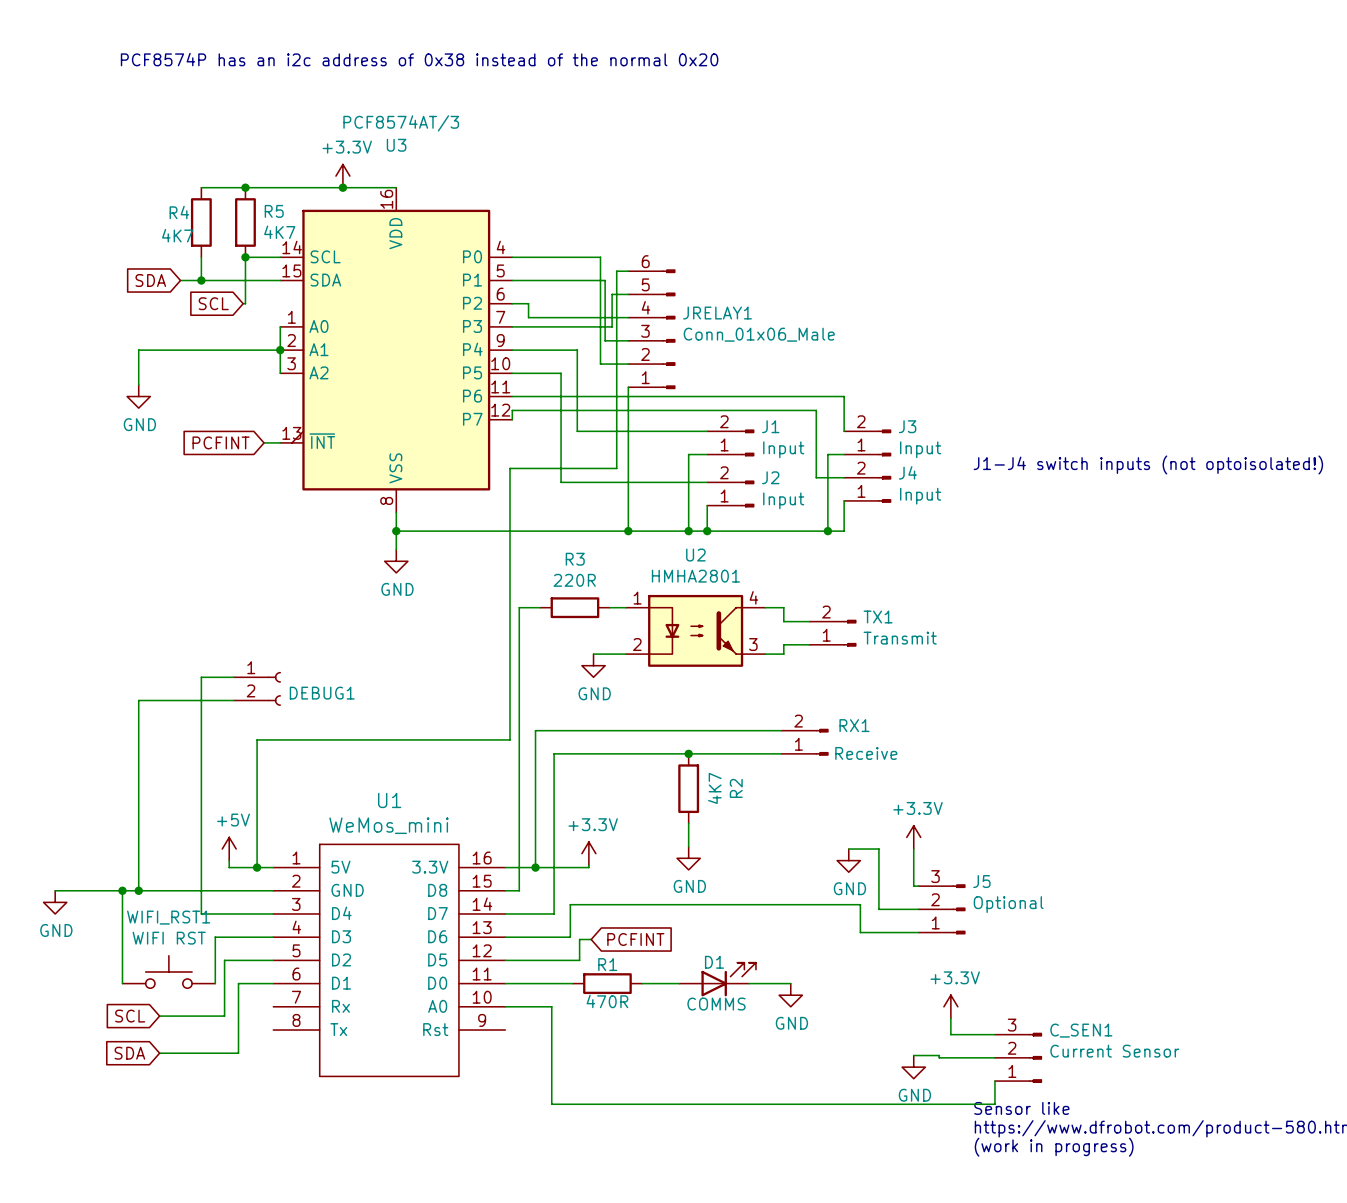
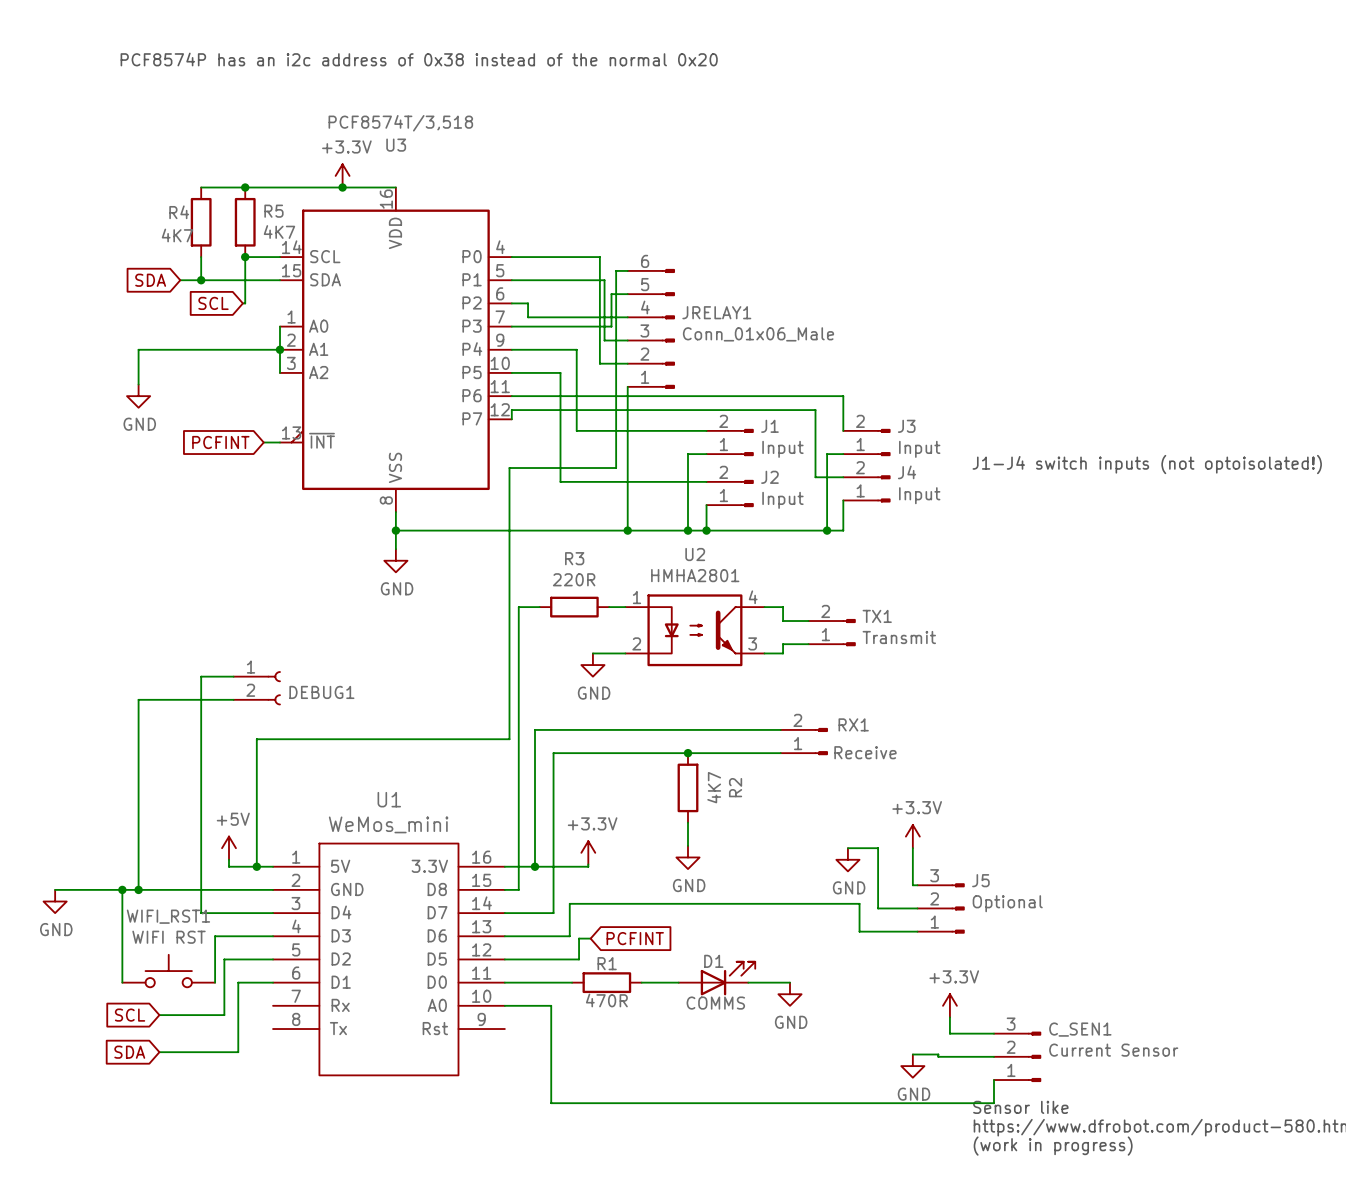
U3 value: PCF8574AT/3 (401, 123) -> PCF8574T/3,518 (400, 123)

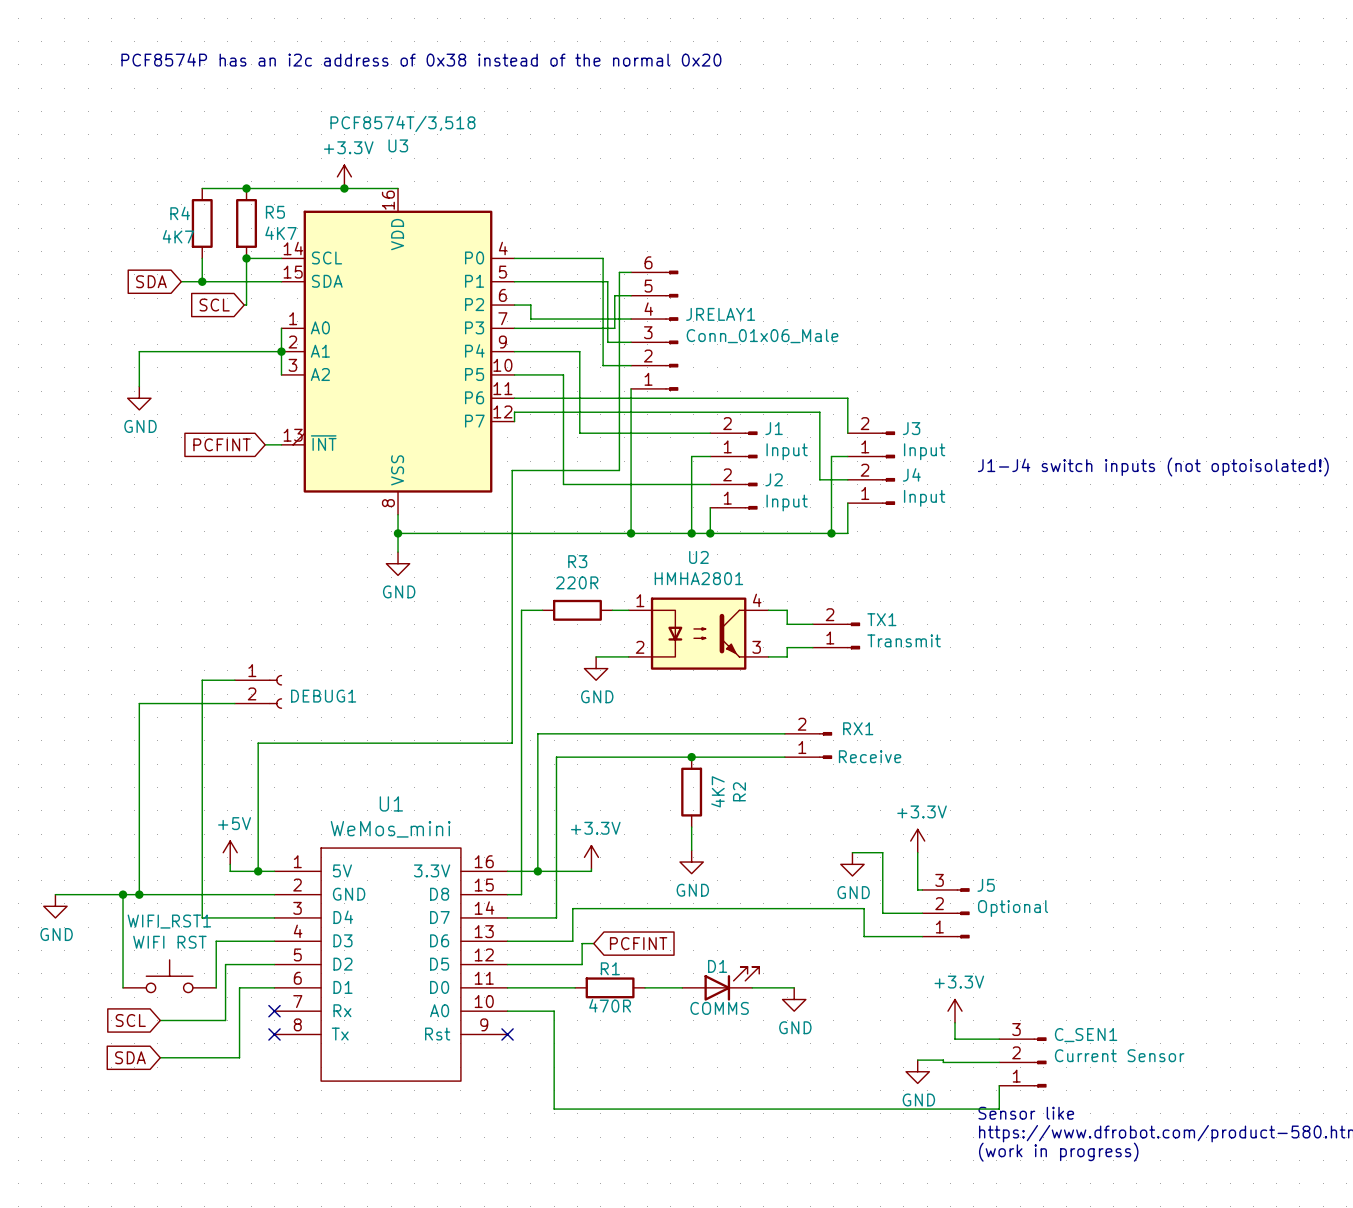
no-connect mark: none -> (274, 1011)
no-connect mark: none -> (274, 1034)
no-connect mark: none -> (507, 1034)

